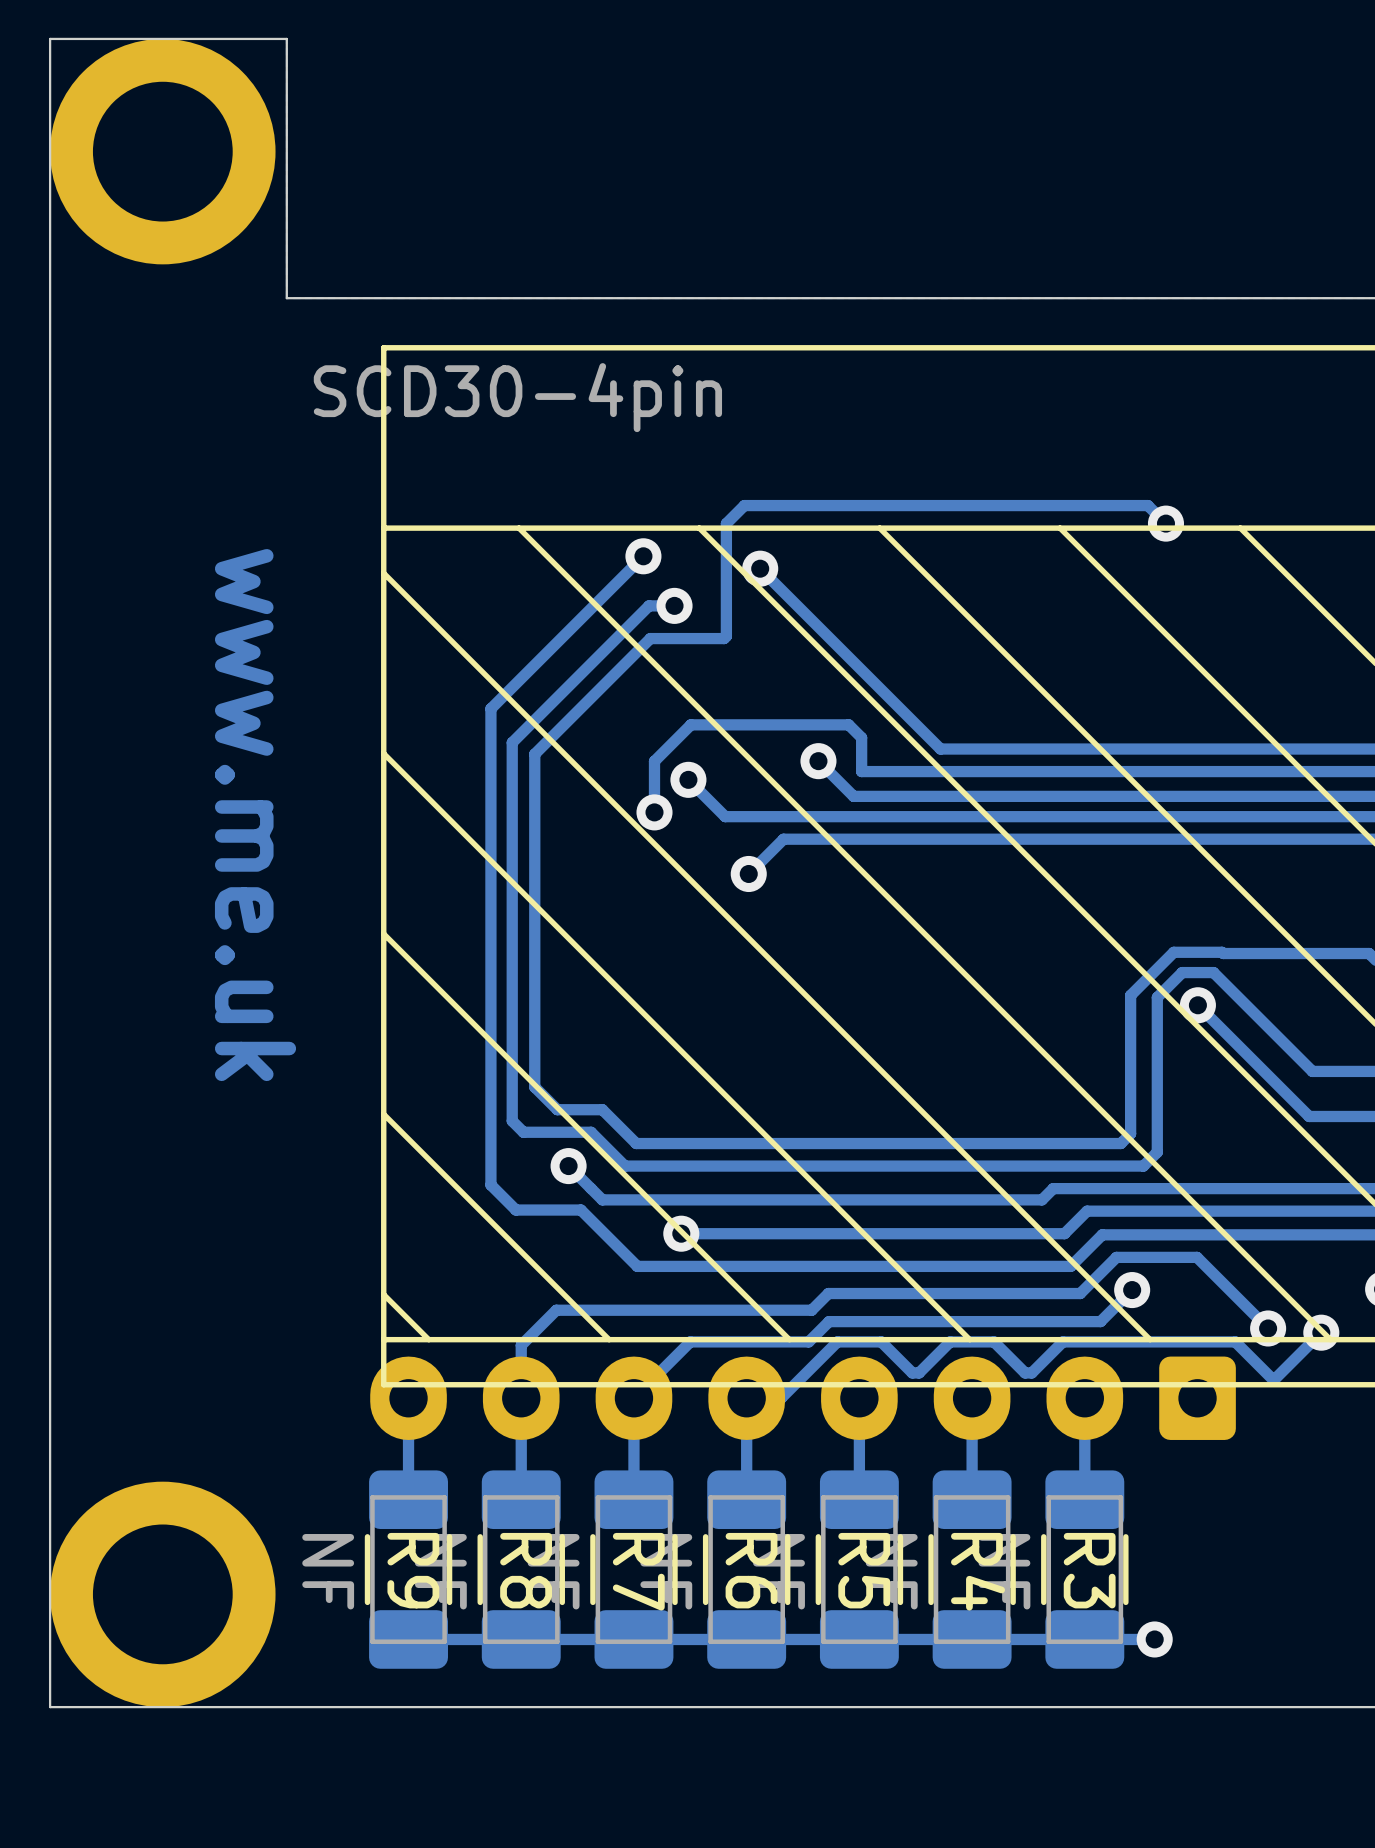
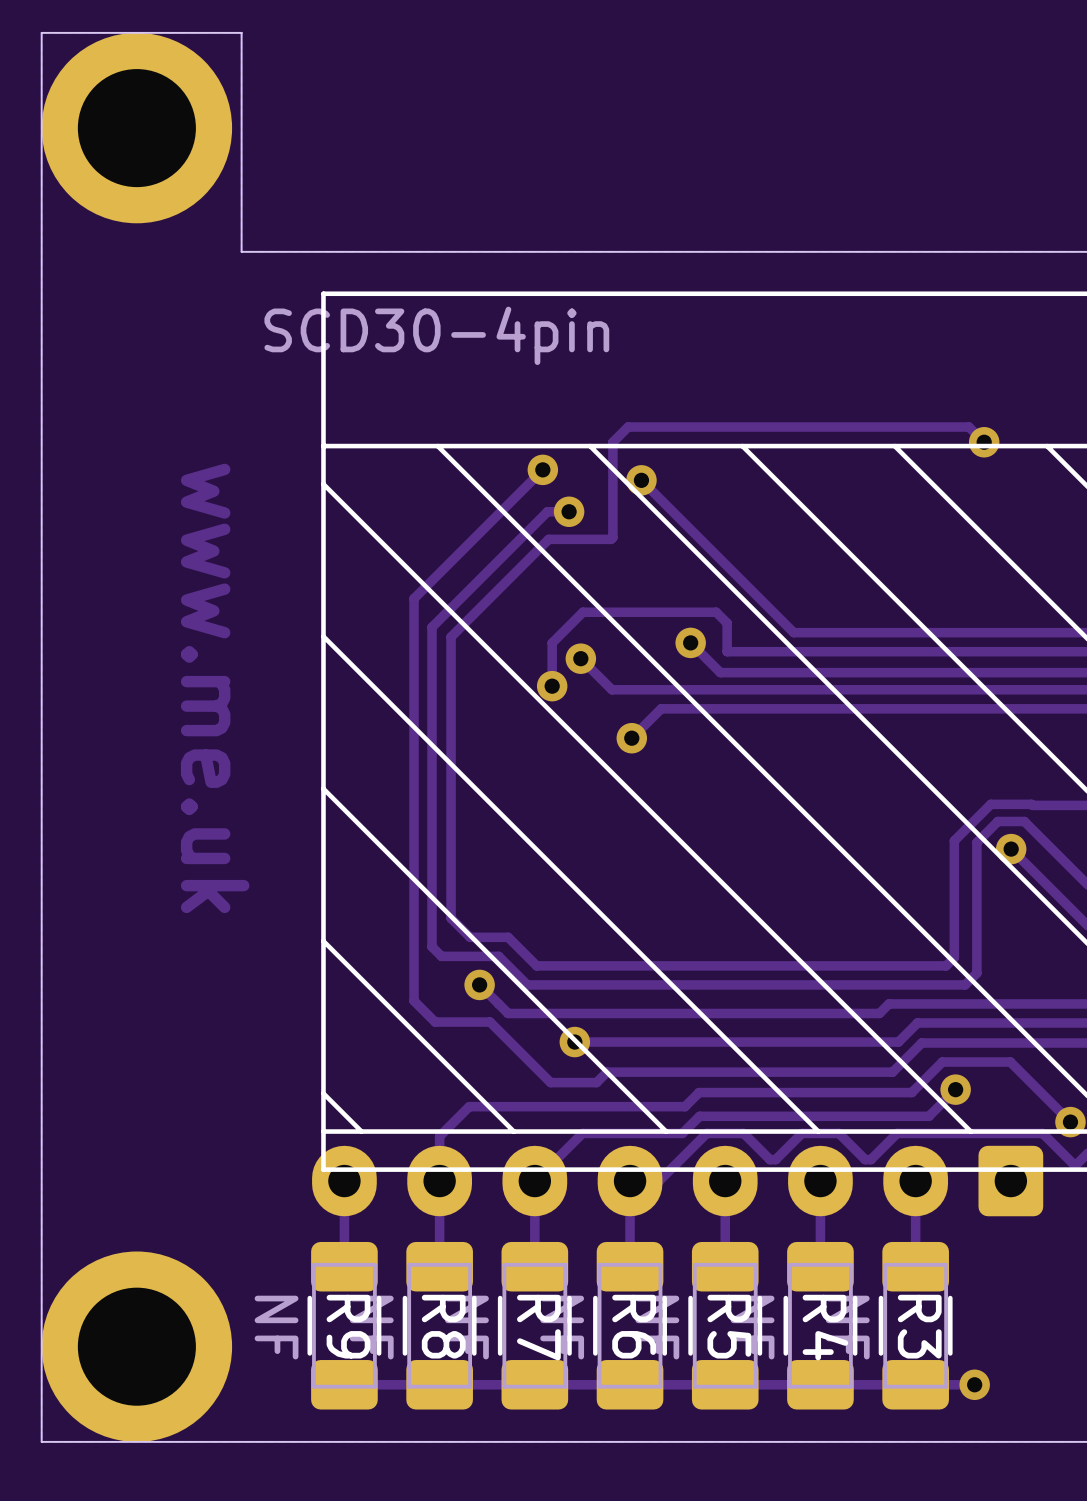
track: (1102, 1234) (1070, 1266) (637, 1266) -> (930, 1042) (921, 1042) (892, 1072) (607, 1072) (596, 1082) (550, 1082) (537, 1069)

